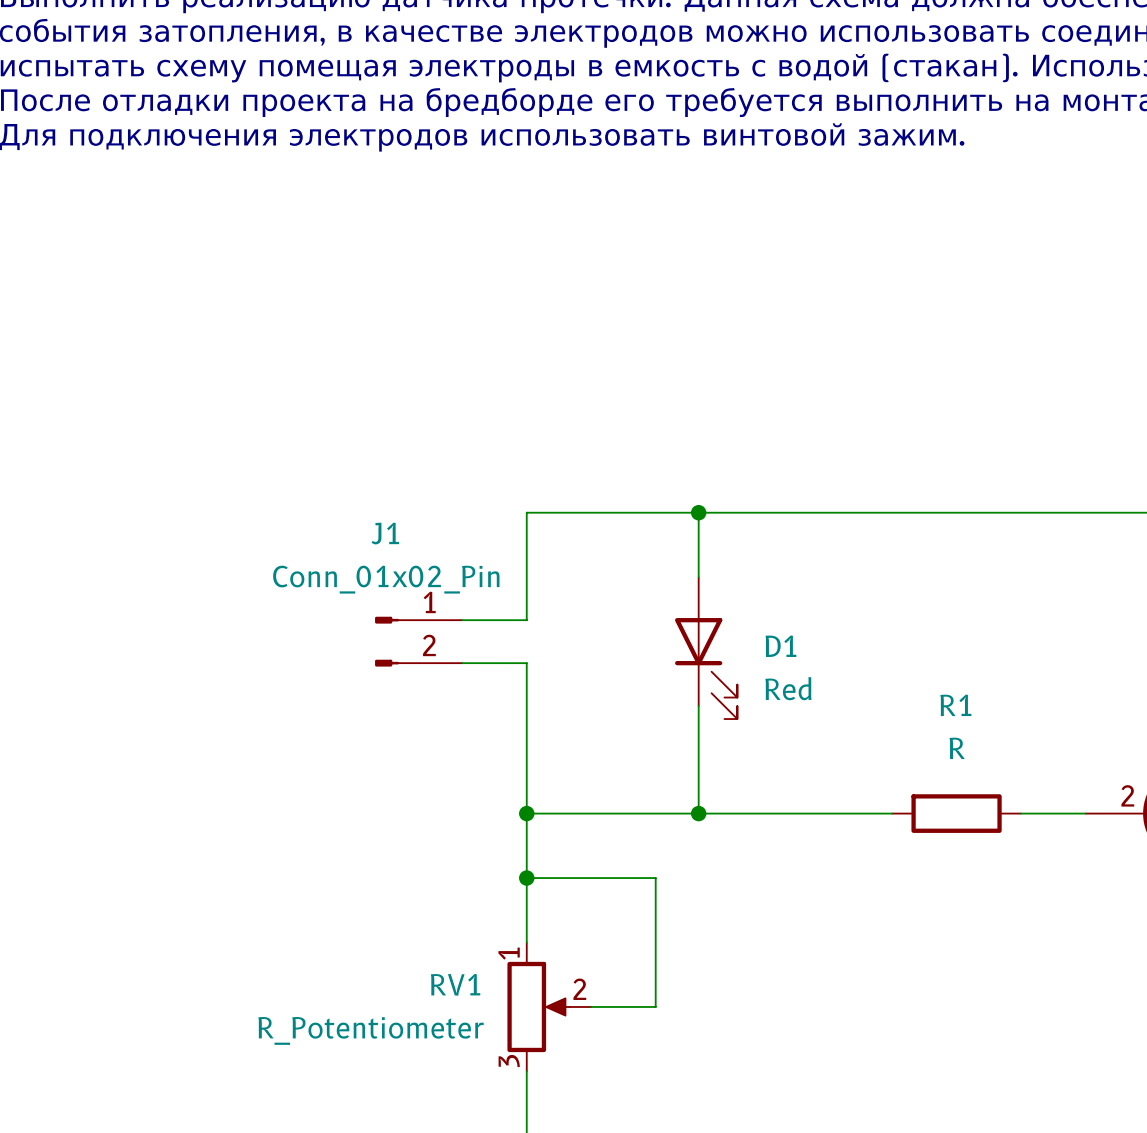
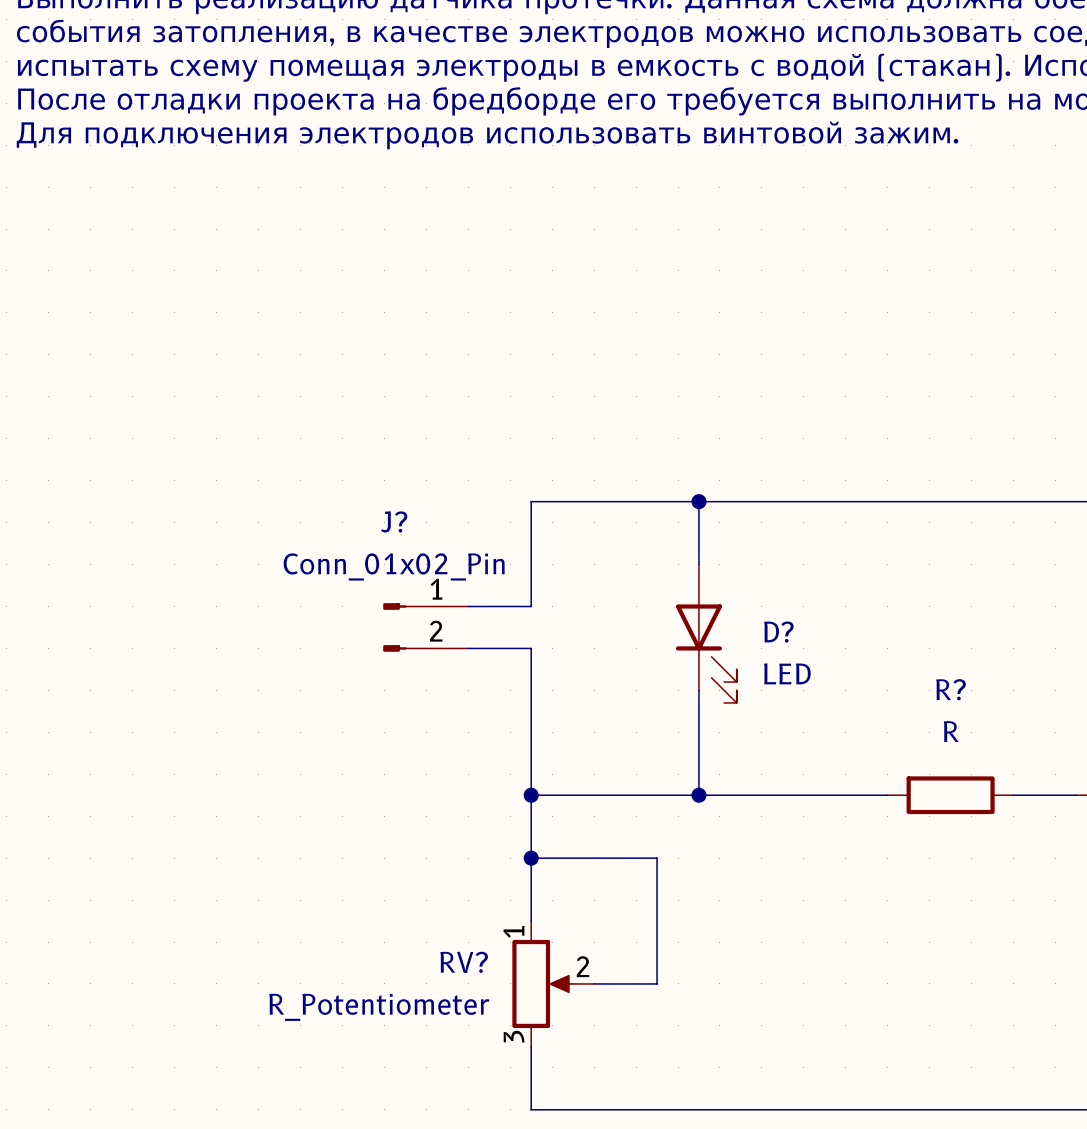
J1 name: J1 (385, 533) -> J? (394, 521)
D1 name: D1 (780, 646) -> D? (778, 632)
D1 value: Red (788, 688) -> LED (787, 673)
R1 name: R1 (955, 705) -> R? (950, 689)
RV1 name: RV1 (455, 984) -> RV? (464, 962)

